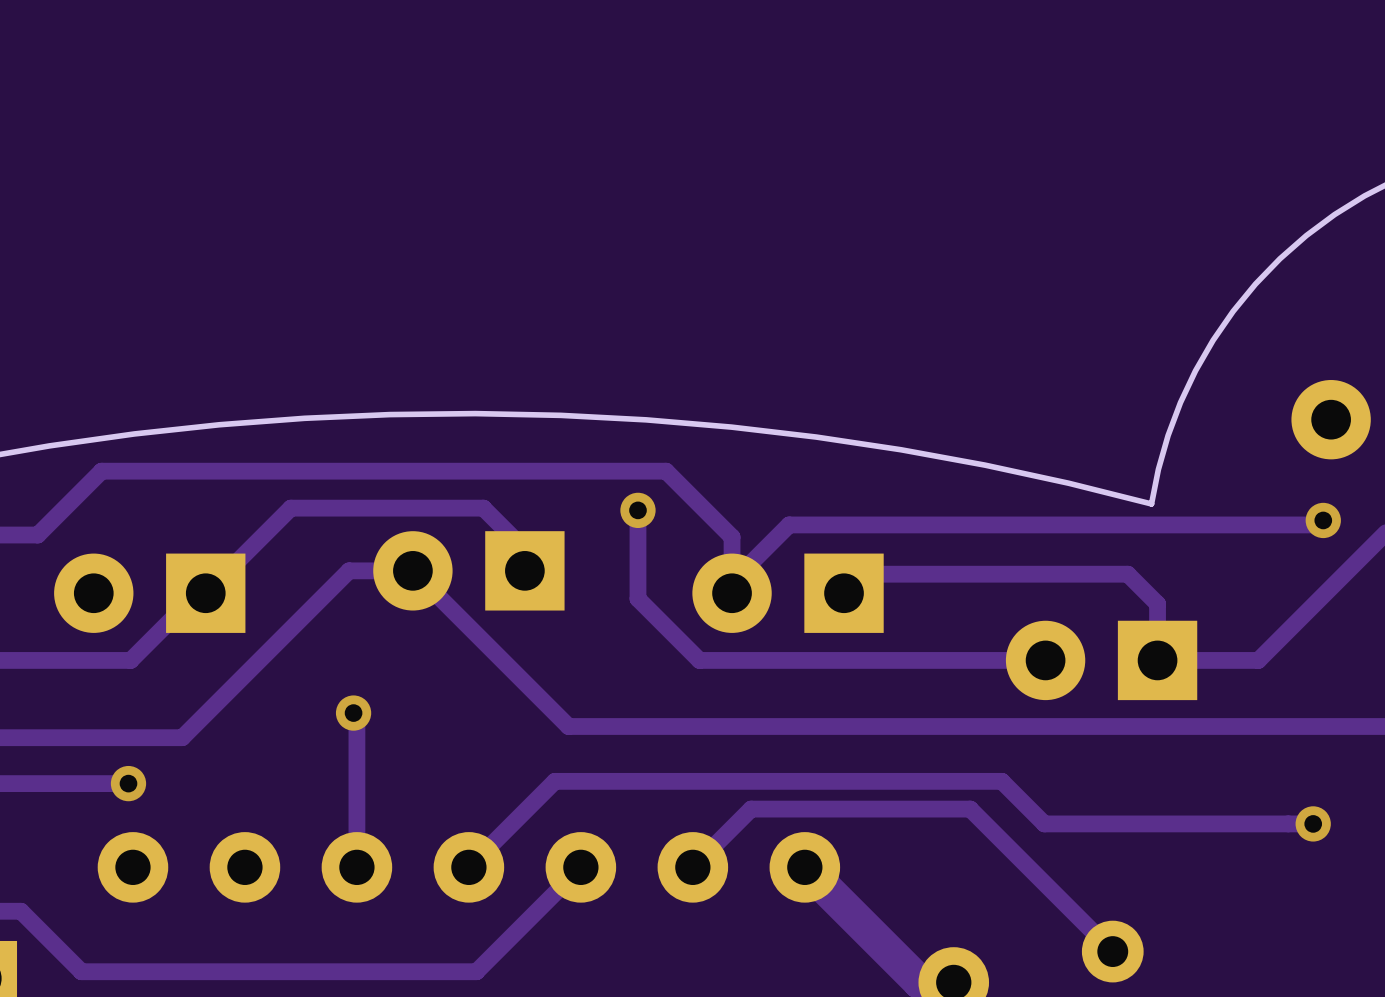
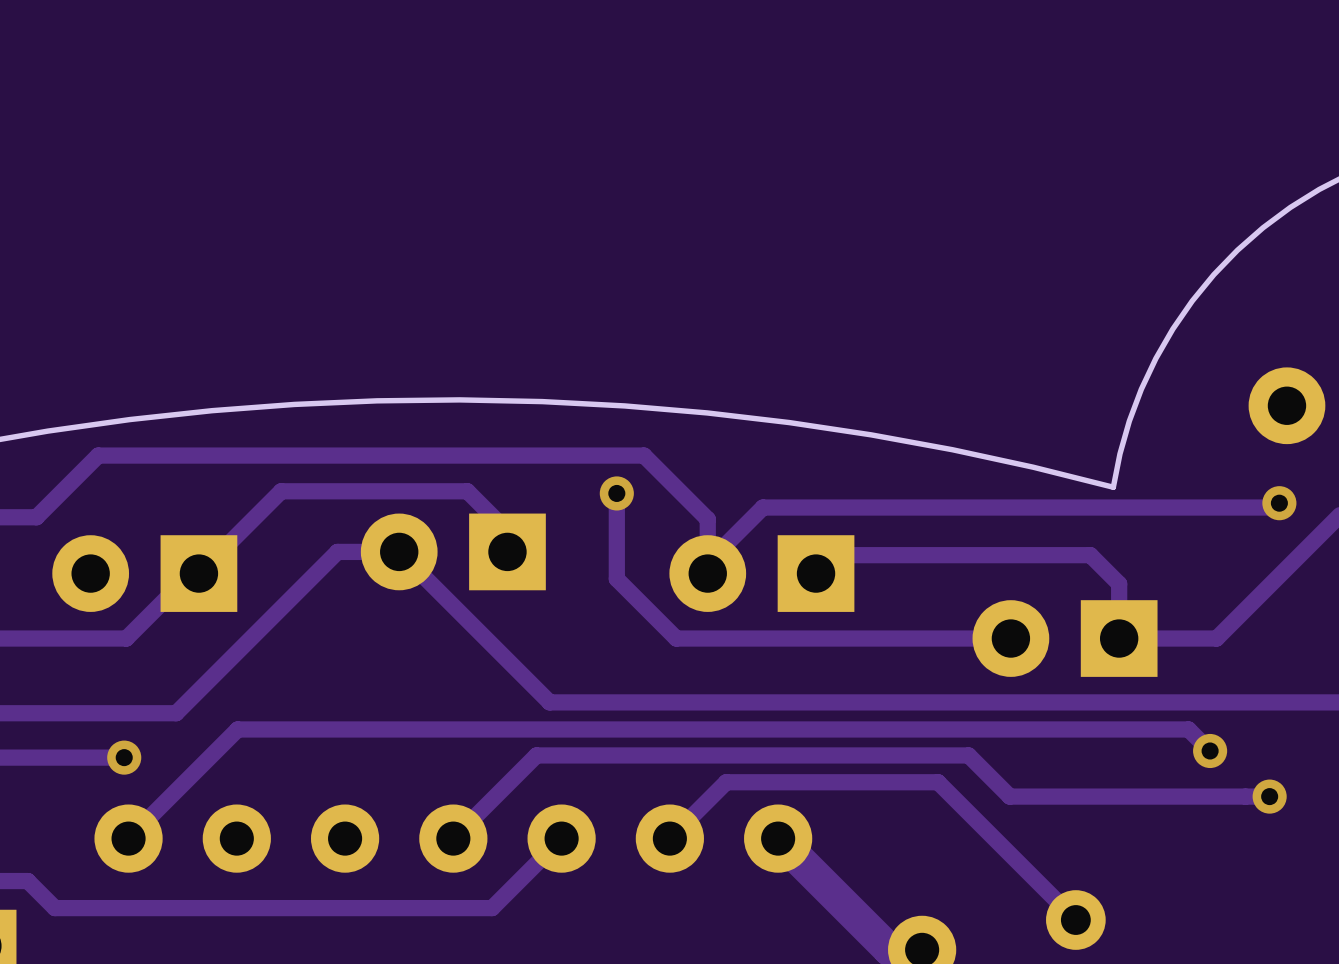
track: (353, 713) (356, 716) (356, 867) -> none
via: (353, 713) -> none
track: none -> (1210, 750) (1188, 729) (237, 729) (128, 838)
via: none -> (1210, 750)
track: (20, 911) (81, 971) (476, 971) (508, 939) -> (20, 881) (27, 881) (54, 908) (492, 908)

